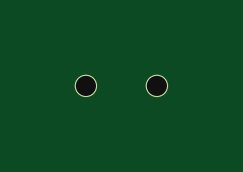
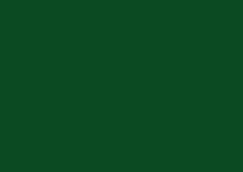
part: (121, 85) -> none

